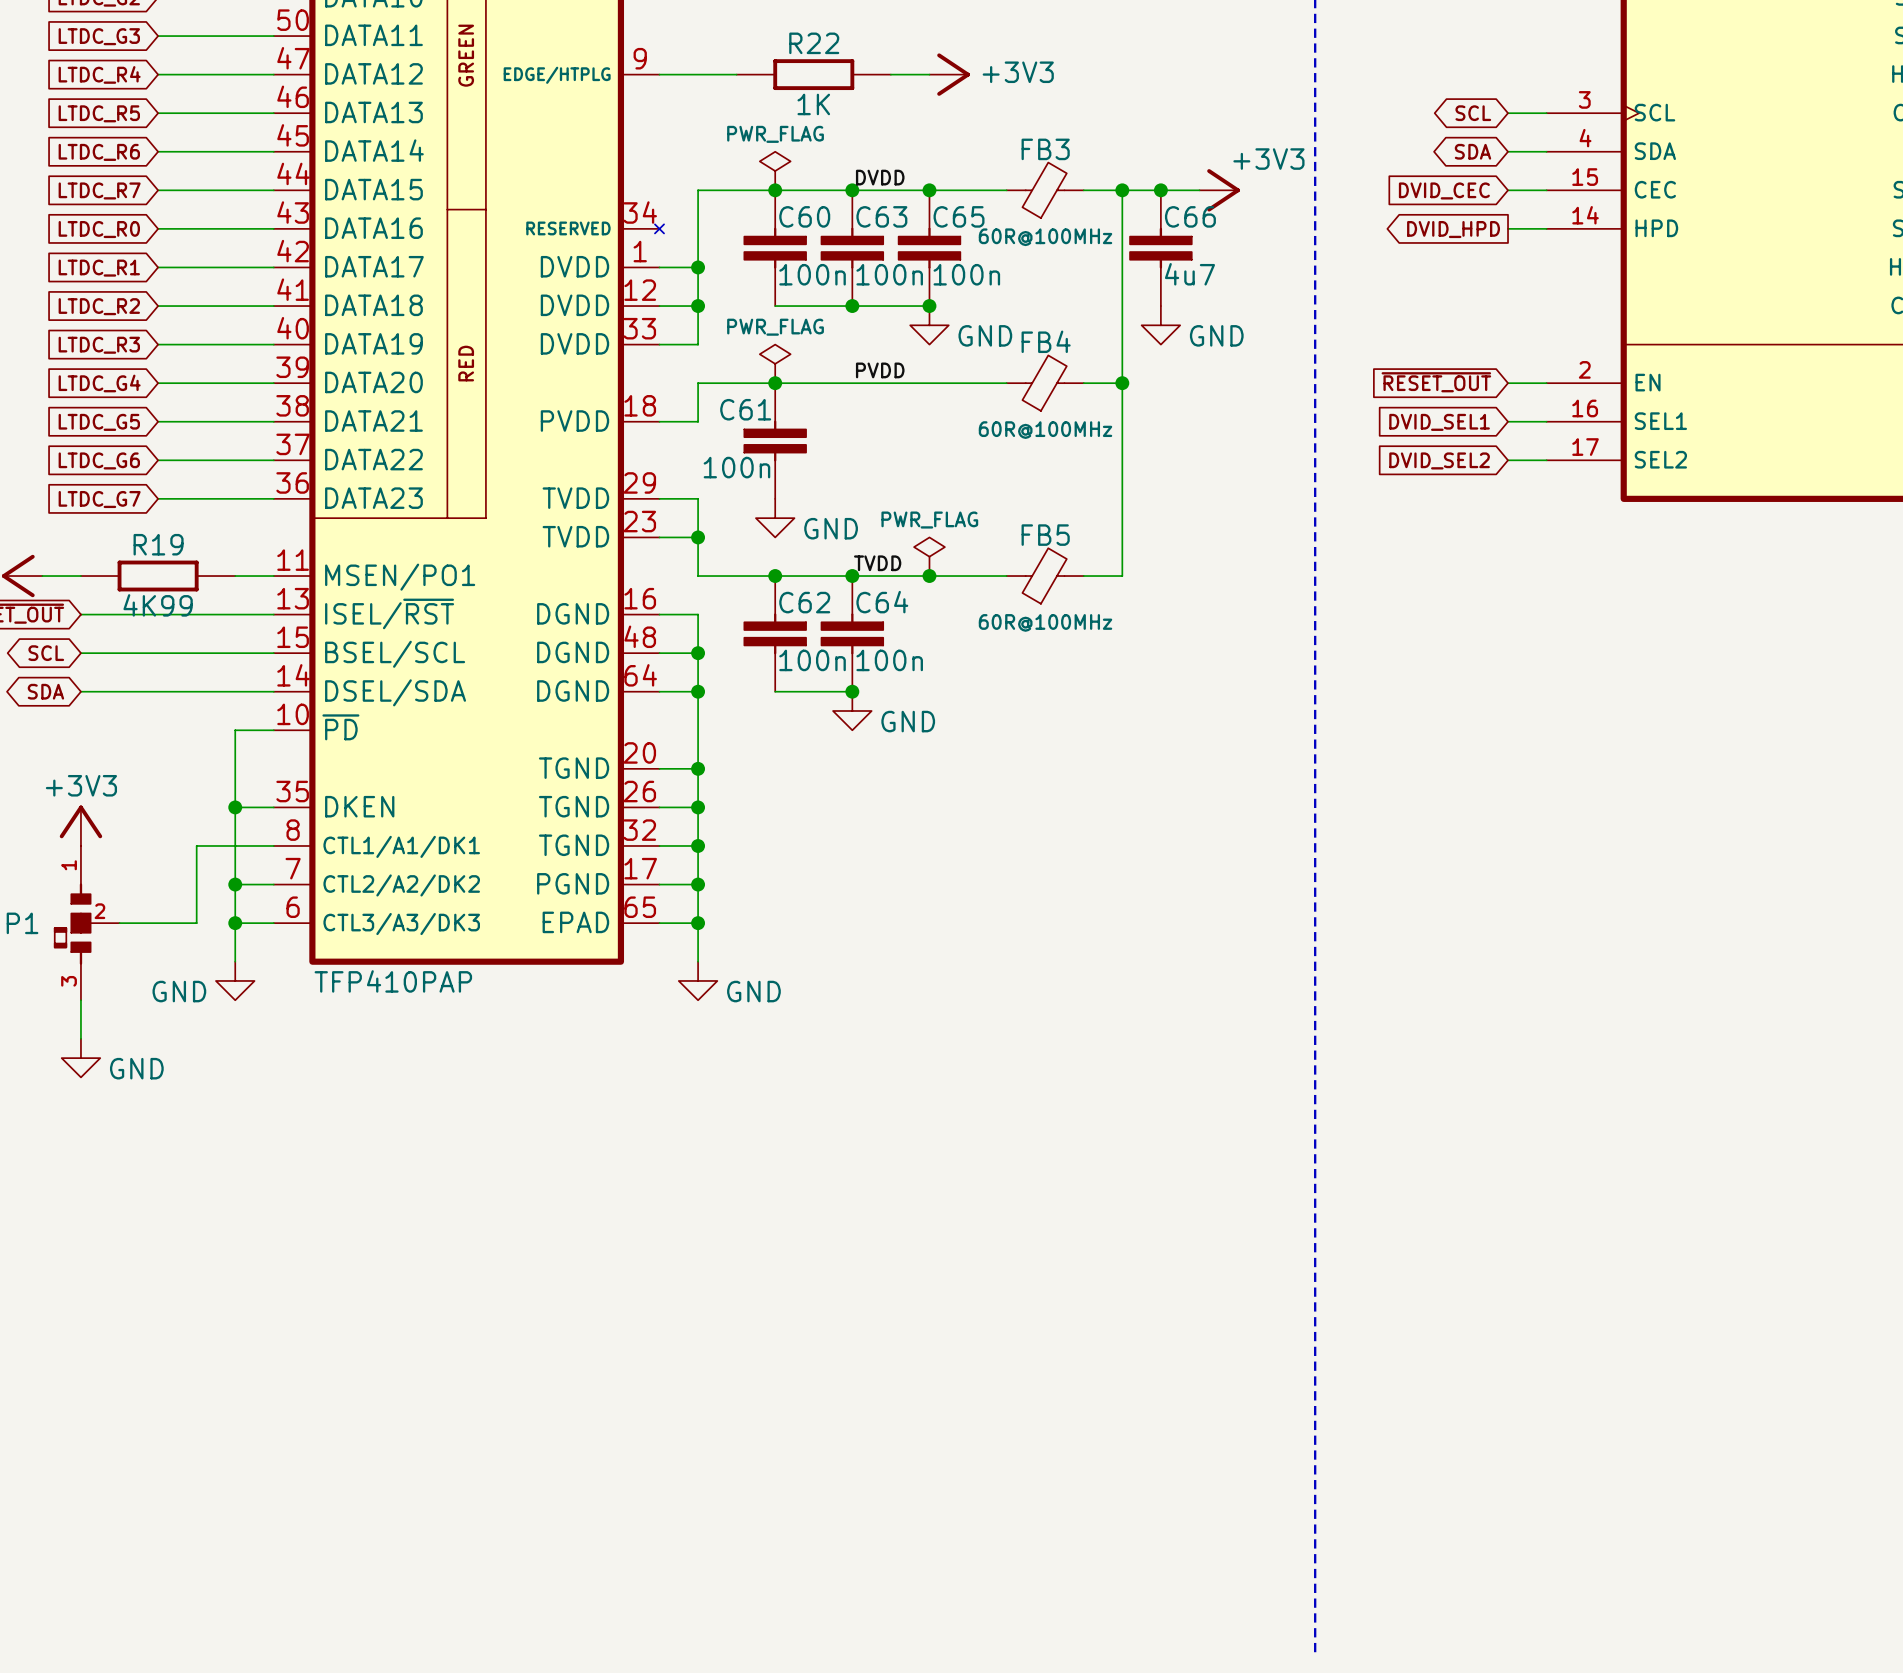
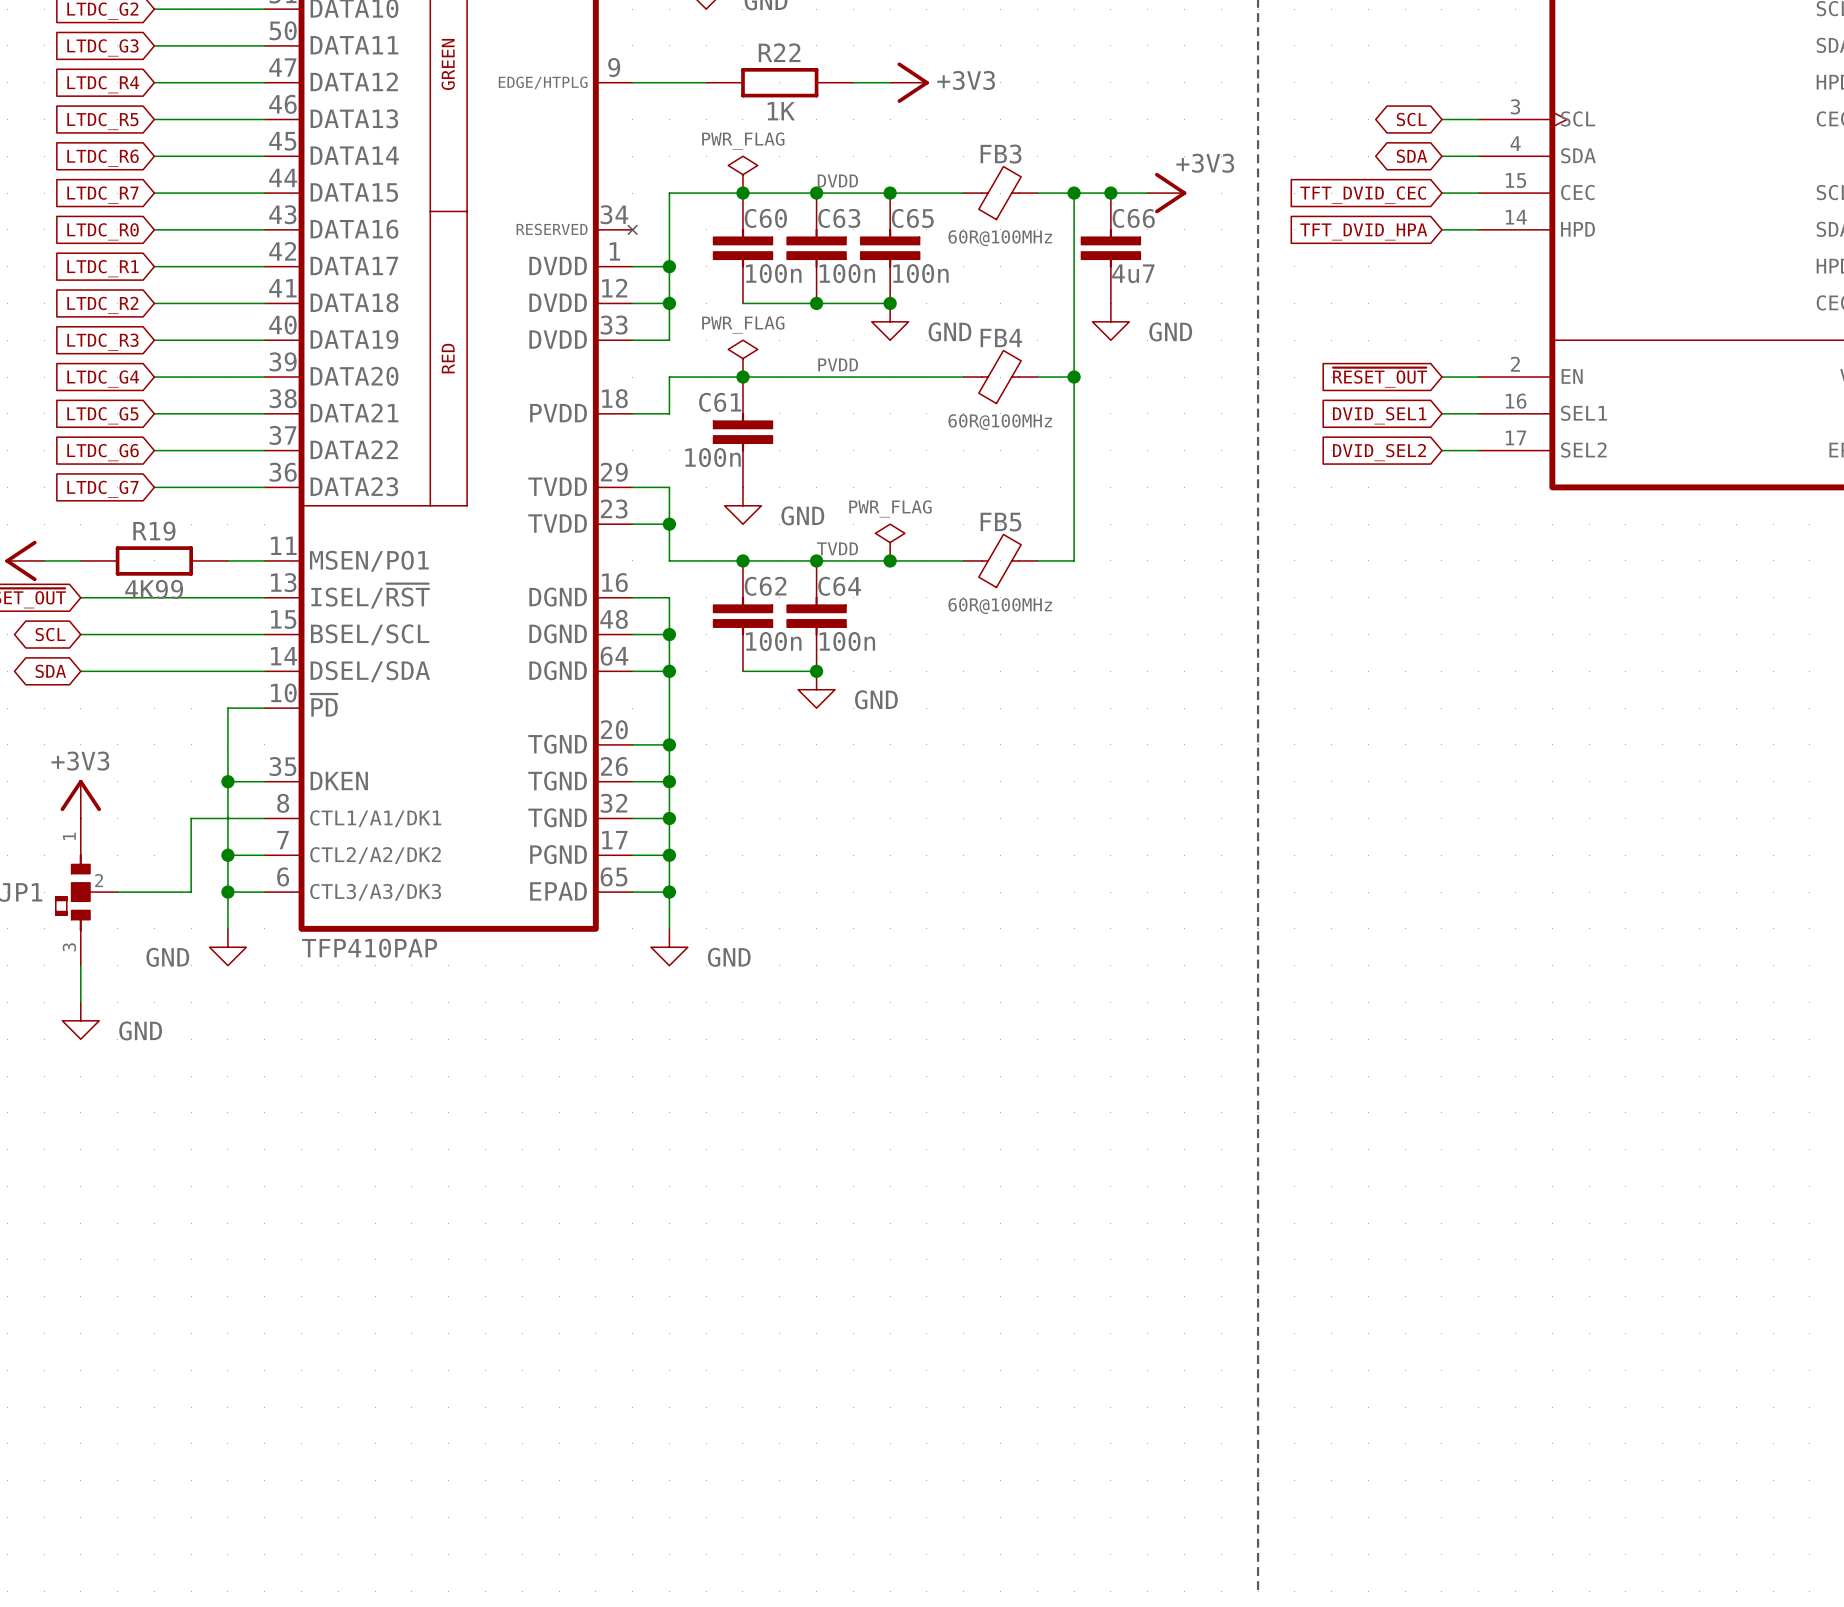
global label: DVID_CEC (1444, 190) -> TFT_DVID_CEC (1363, 195)
global label shape: output (1453, 229) -> input (1363, 231)
global label: DVID_HPD (1453, 229) -> TFT_DVID_HPA (1363, 231)

